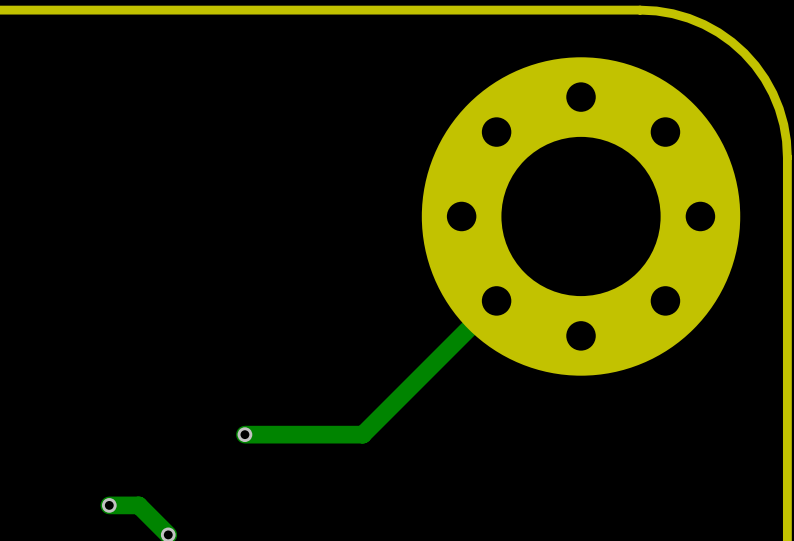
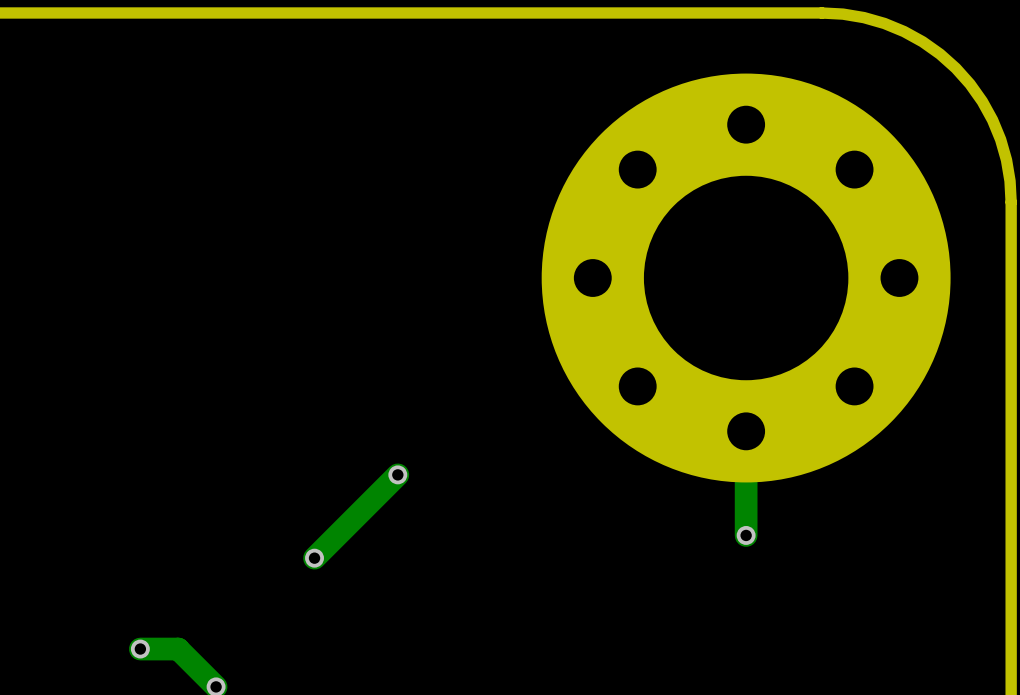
track: (498, 299) (362, 434) (244, 434) -> (397, 474) (314, 558)
track: none -> (746, 429) (746, 535)
via: none -> (397, 474)
via: none -> (746, 535)

